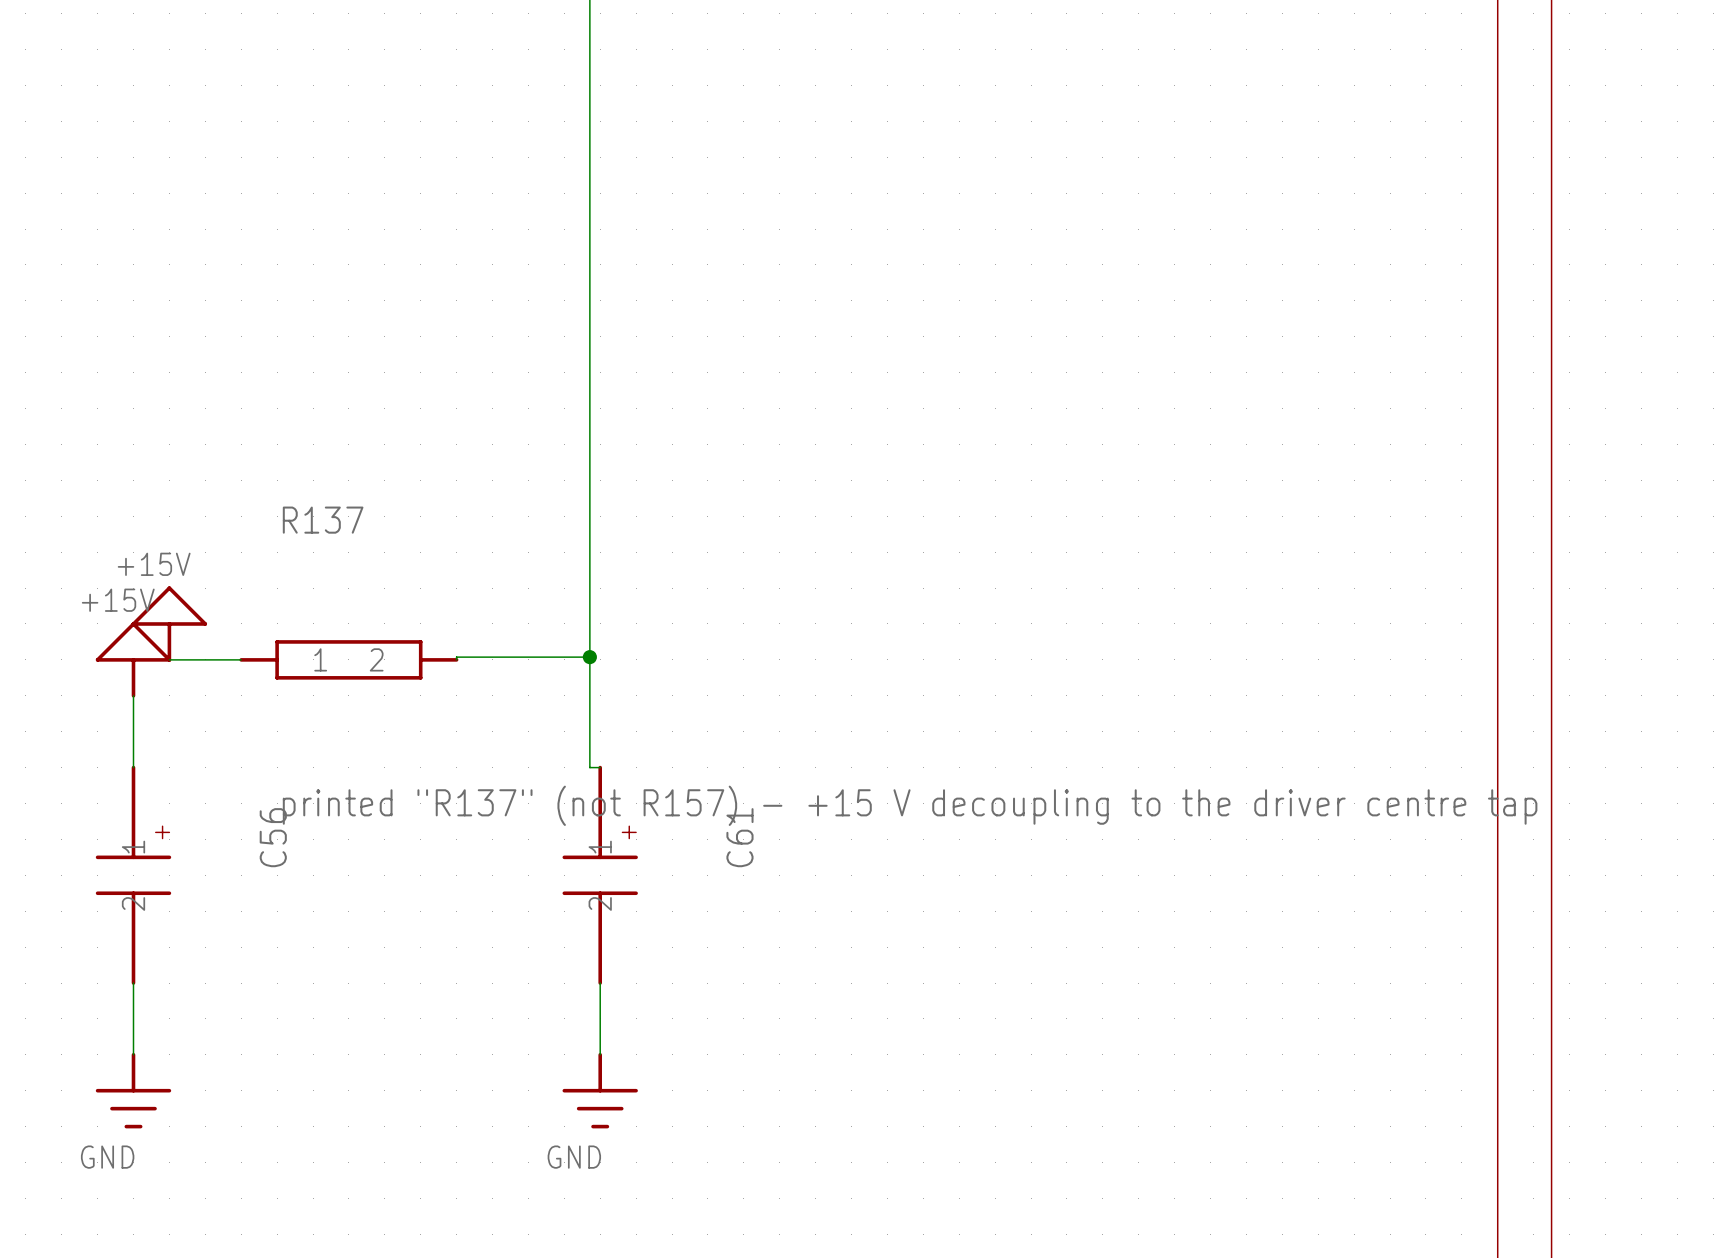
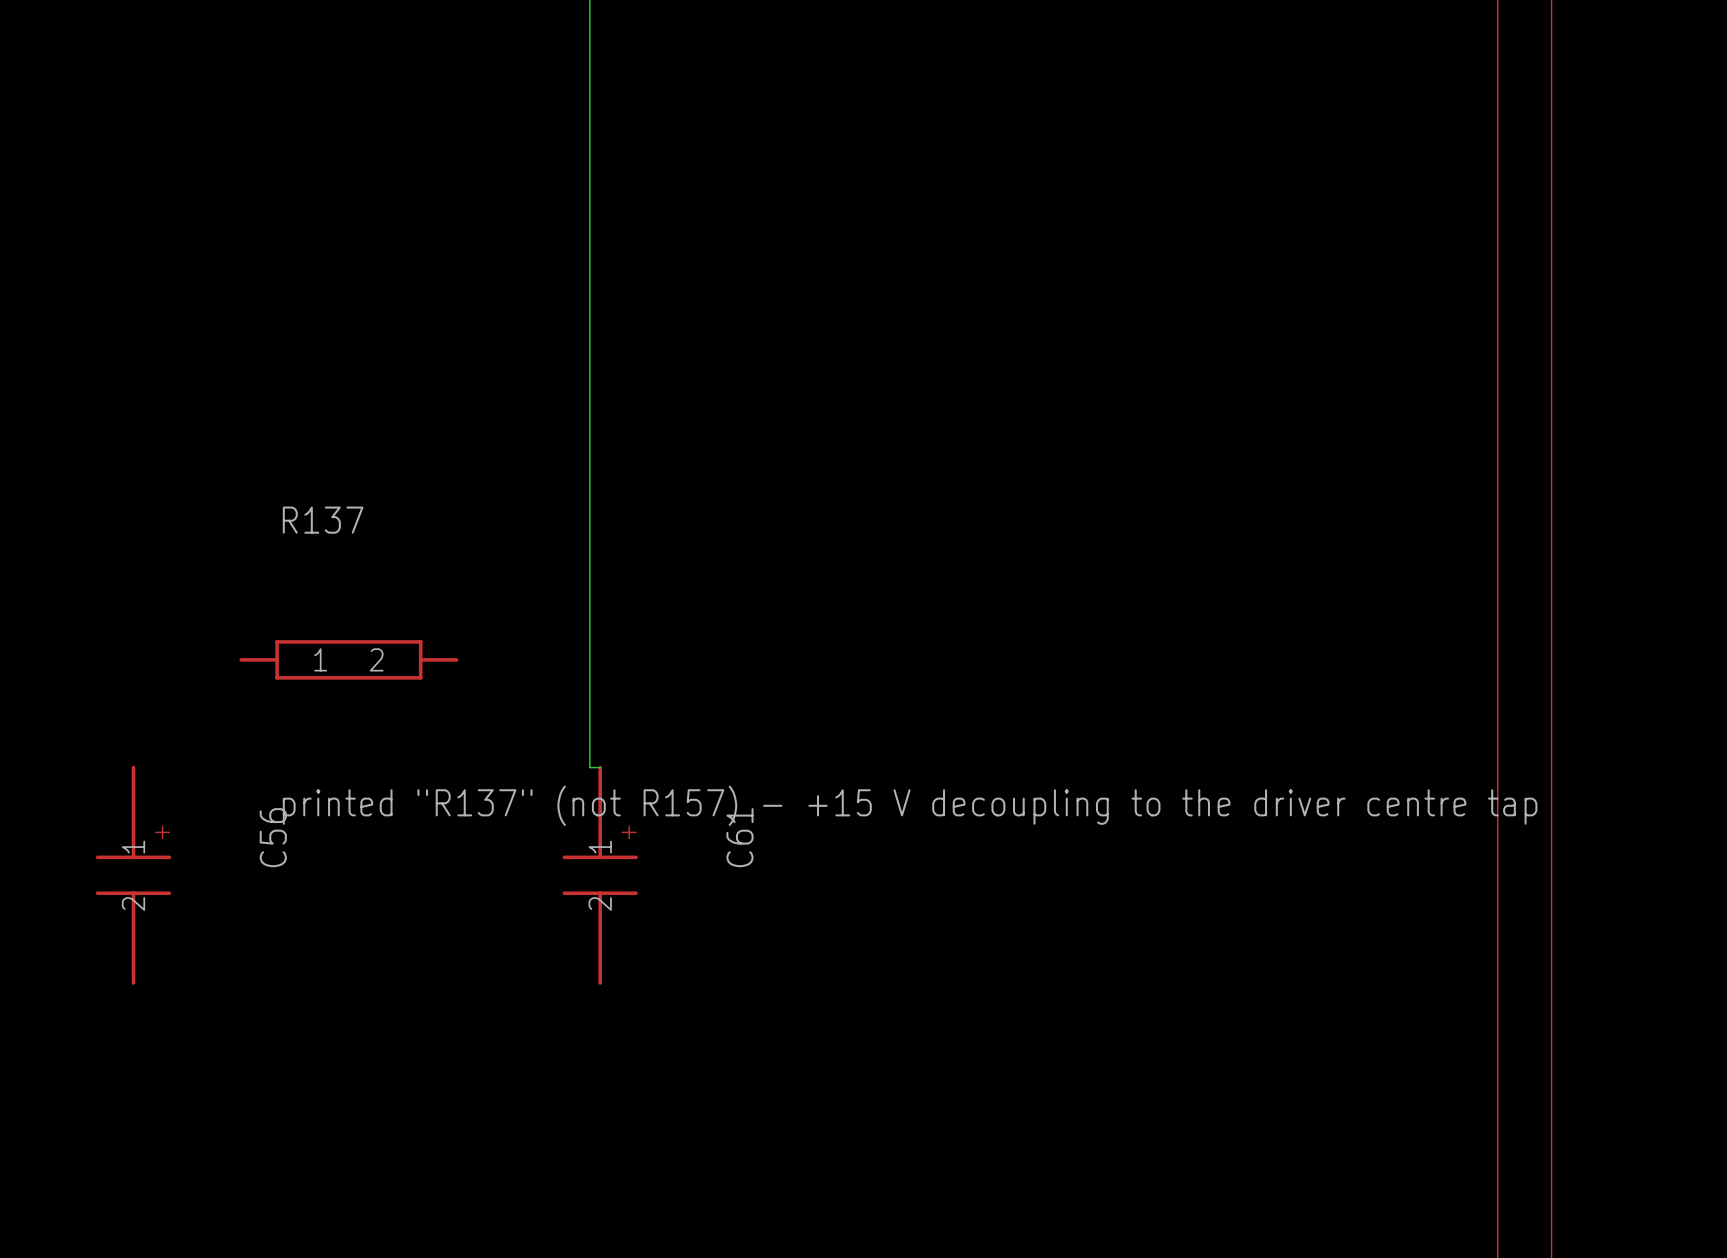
power symbol: (169, 623) -> none
wire: (589, 657) (456, 657) (456, 659) -> none
junction: (589, 657) -> none
power symbol: (133, 659) -> none
wire: (169, 659) (241, 659) -> none
wire: (133, 695) (133, 767) -> none
wire: (133, 983) (133, 1054) -> none
wire: (600, 983) (600, 1054) -> none
power symbol: (133, 1090) -> none
power symbol: (600, 1090) -> none

